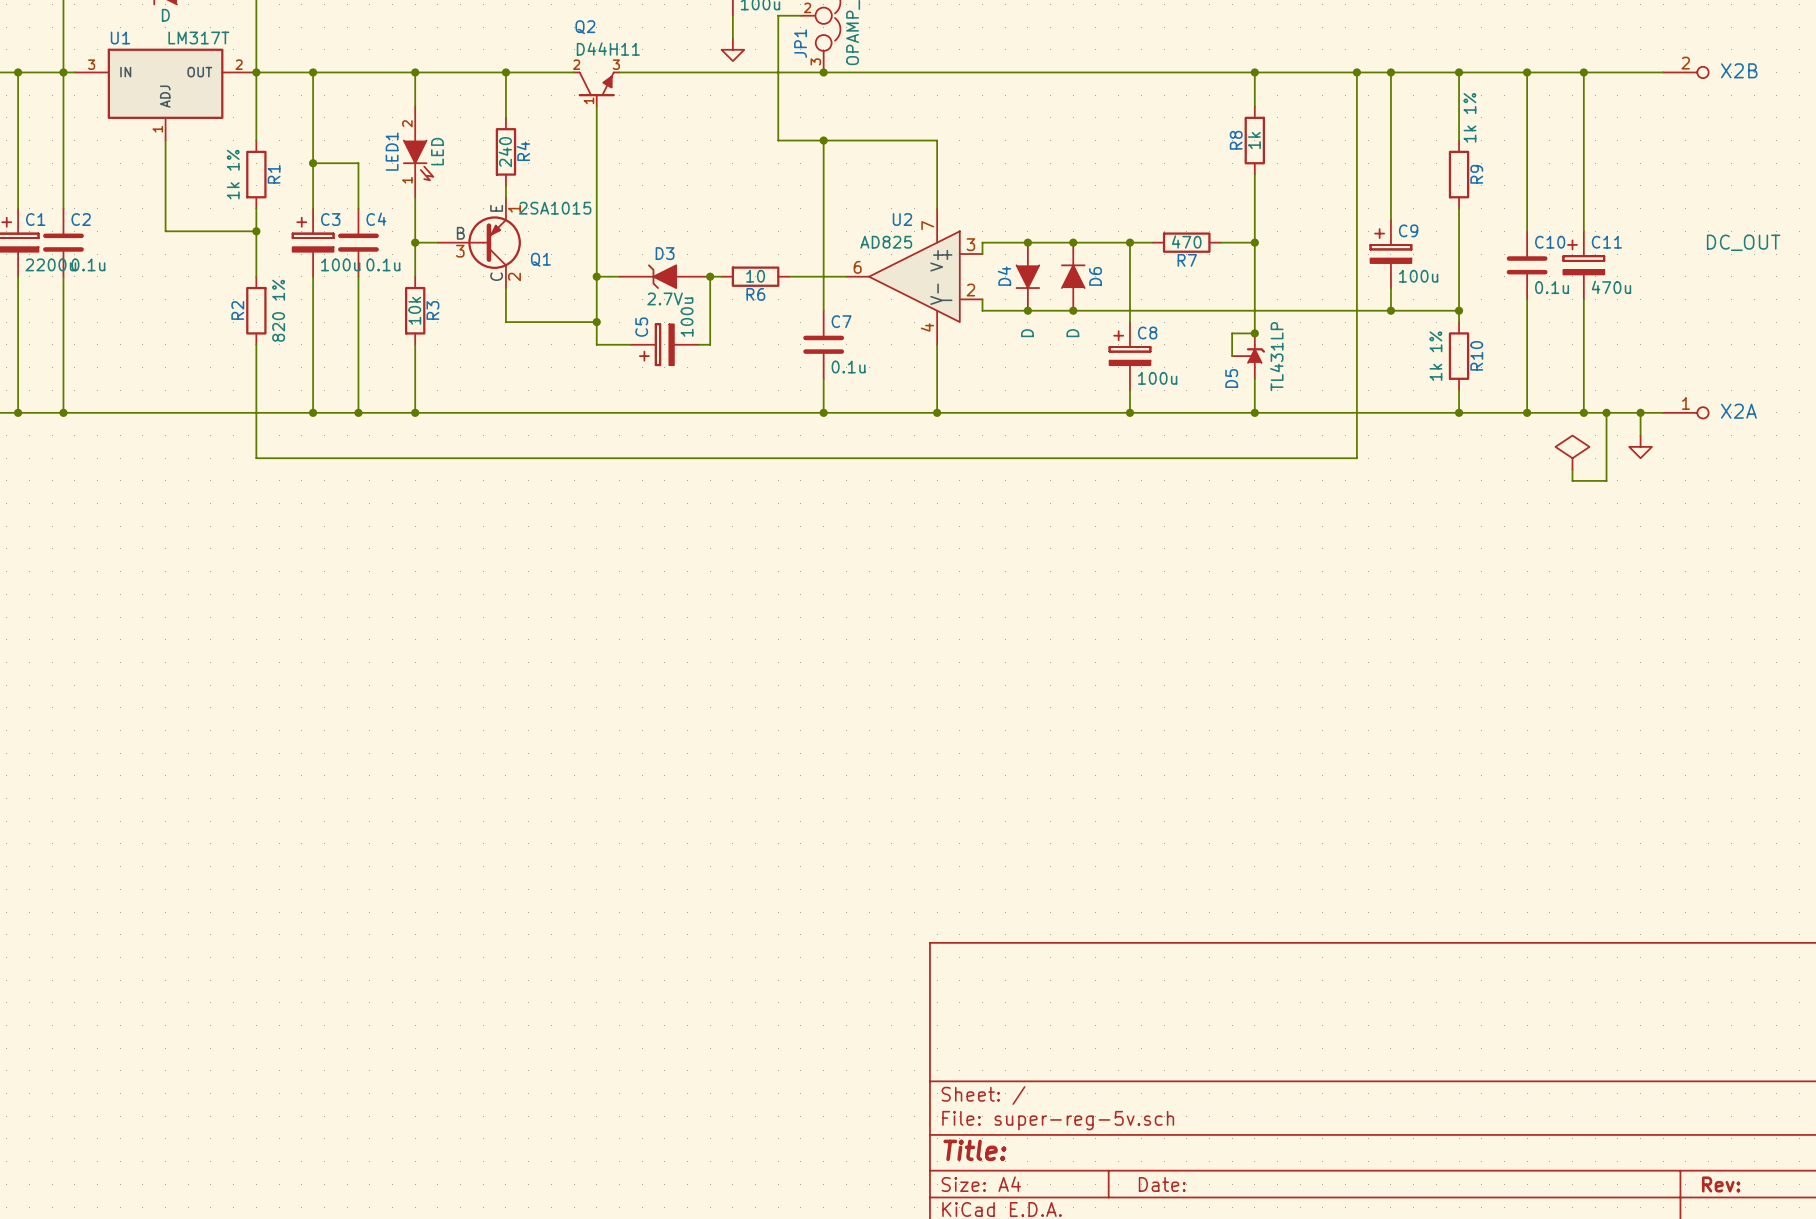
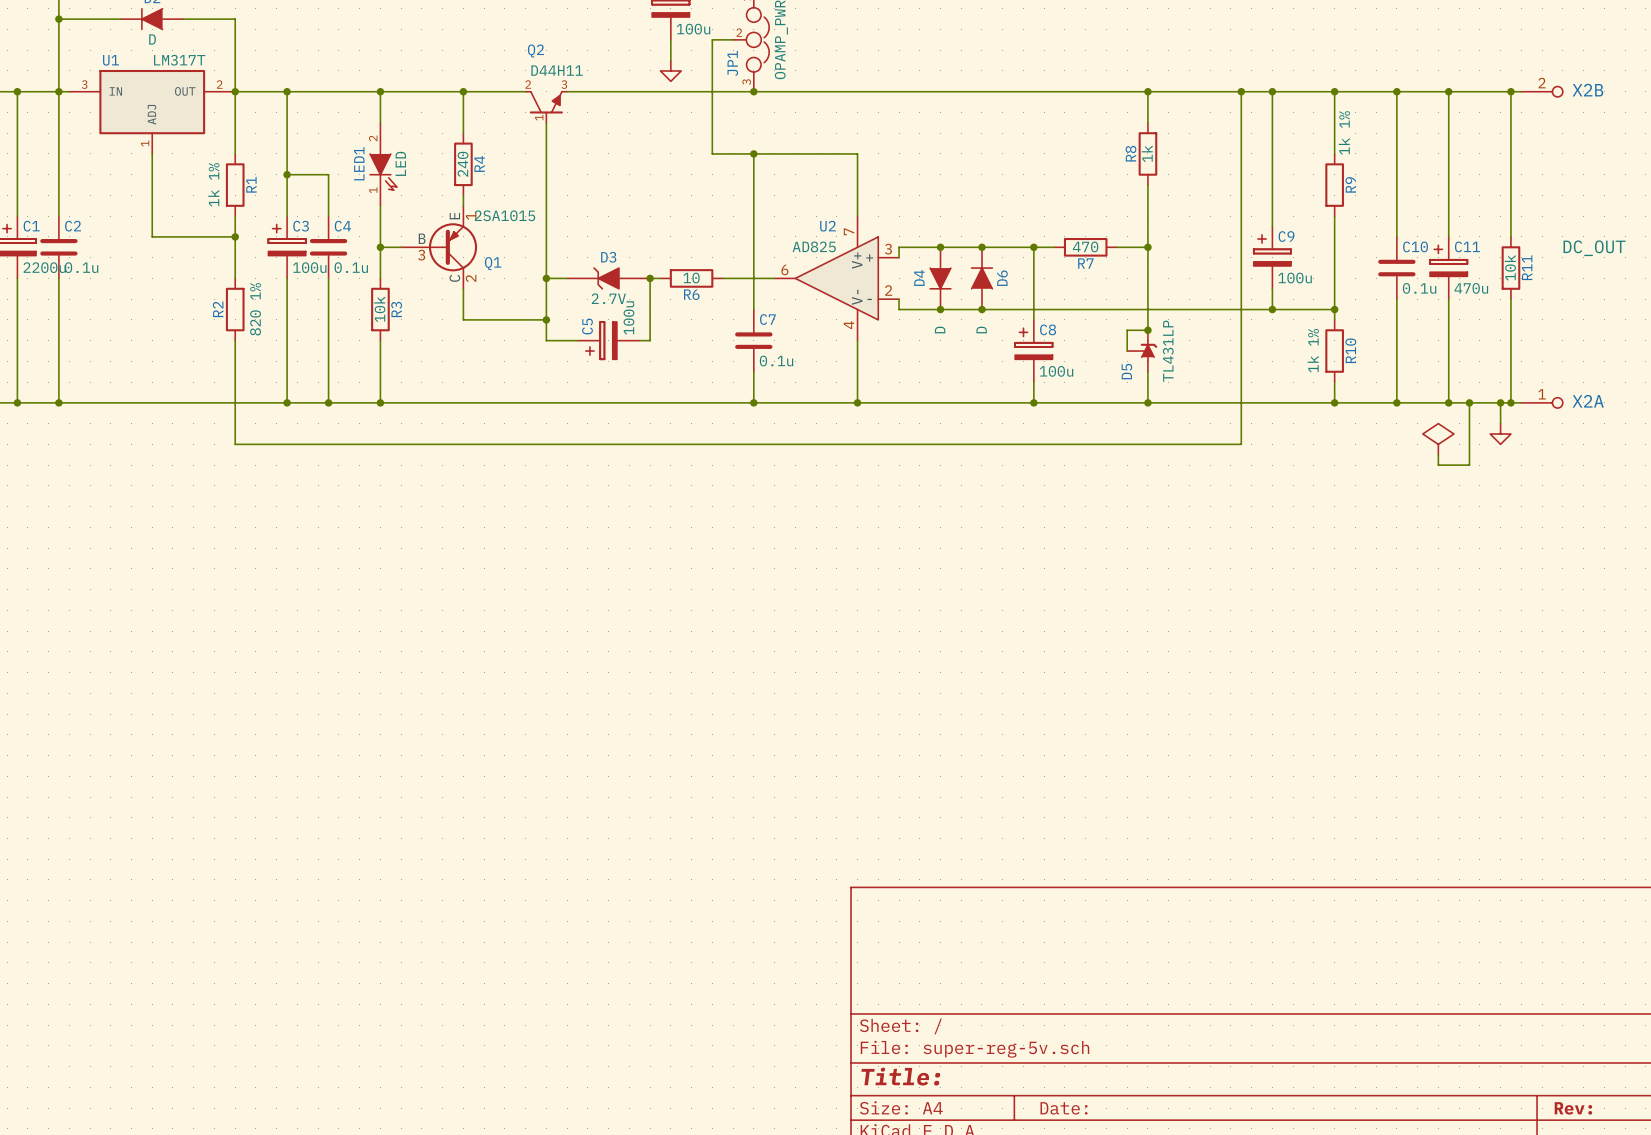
wire: none -> (1510, 91) (1510, 236)
junction: none -> (1510, 91)
R11: none -> 10k (1510, 268)
wire: none -> (1510, 299) (1510, 402)
junction: none -> (1510, 402)

